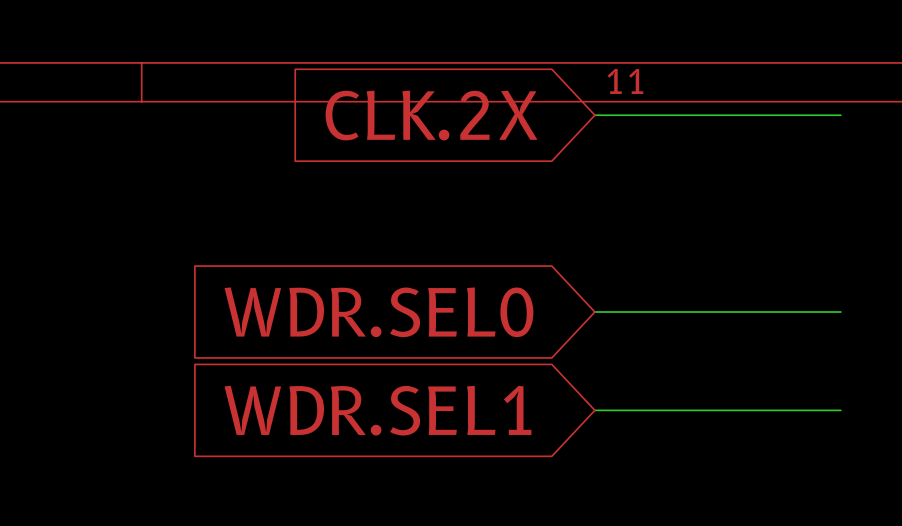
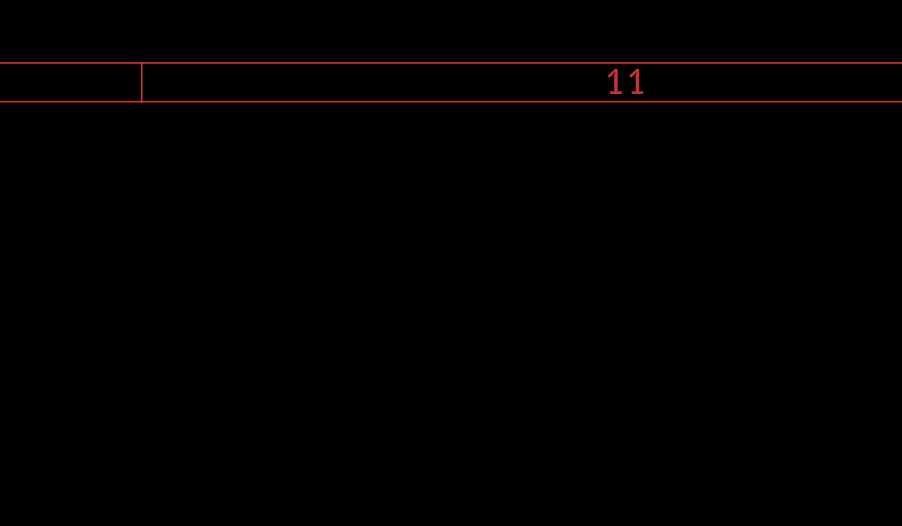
global label: CLK.2X (431, 115) -> none
wire: (594, 115) (840, 115) -> none
global label: WDR.SEL0 (378, 312) -> none
wire: (594, 312) (840, 312) -> none
global label: WDR.SEL1 (378, 410) -> none
wire: (594, 410) (840, 410) -> none

